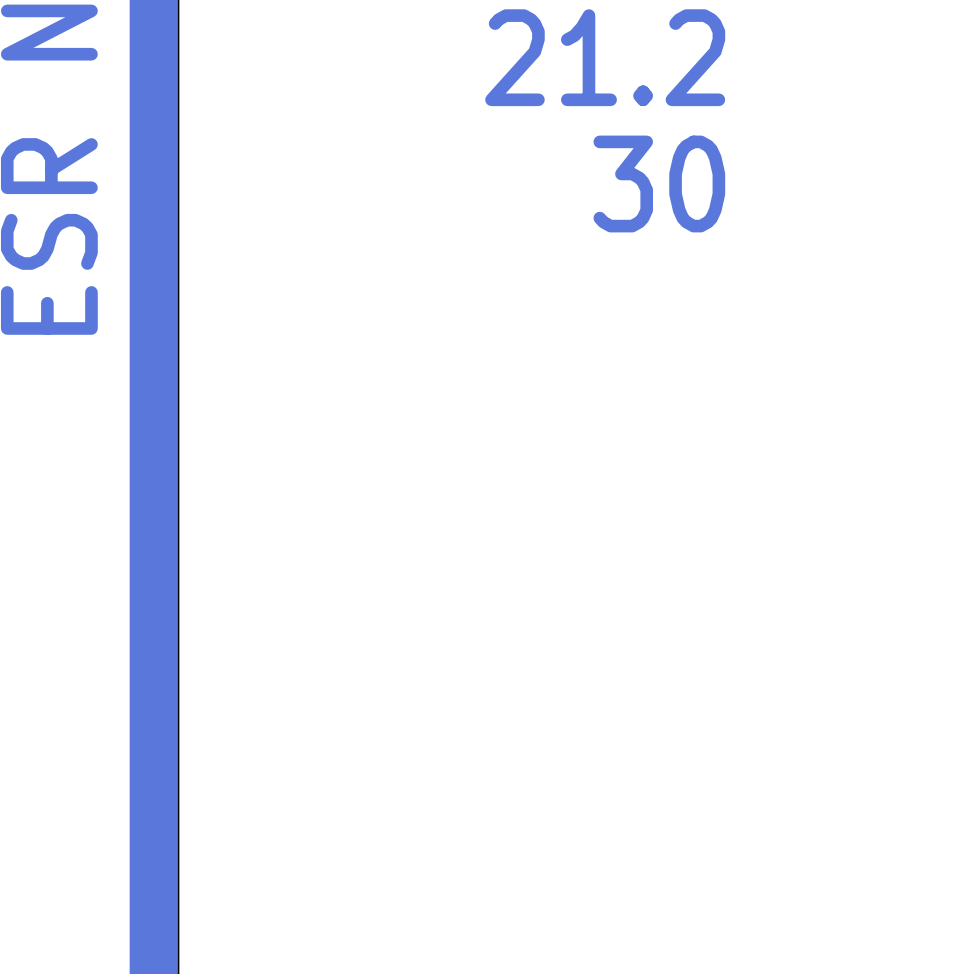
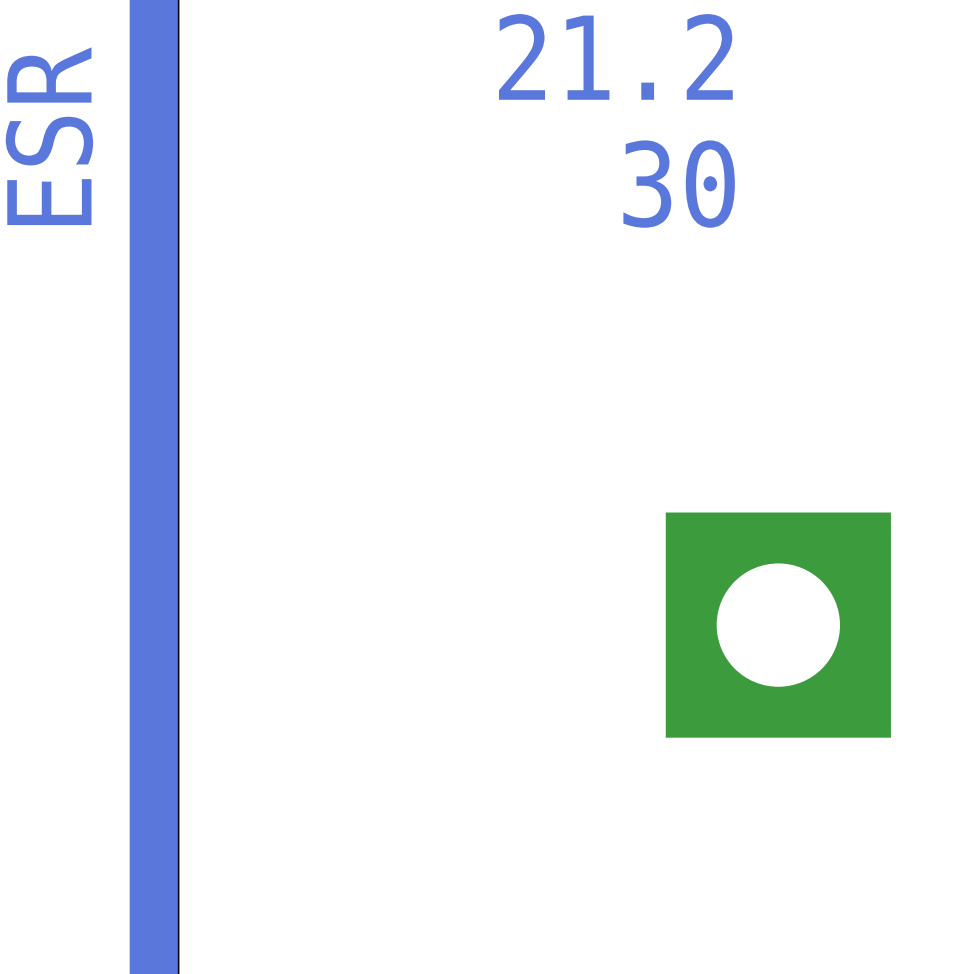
part: none -> (778, 625)

